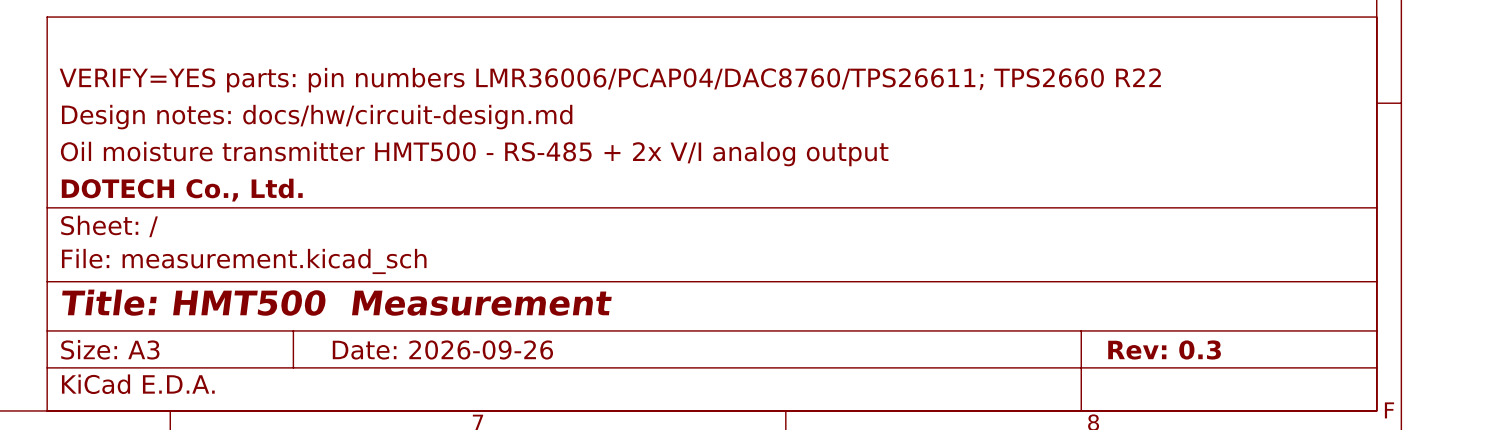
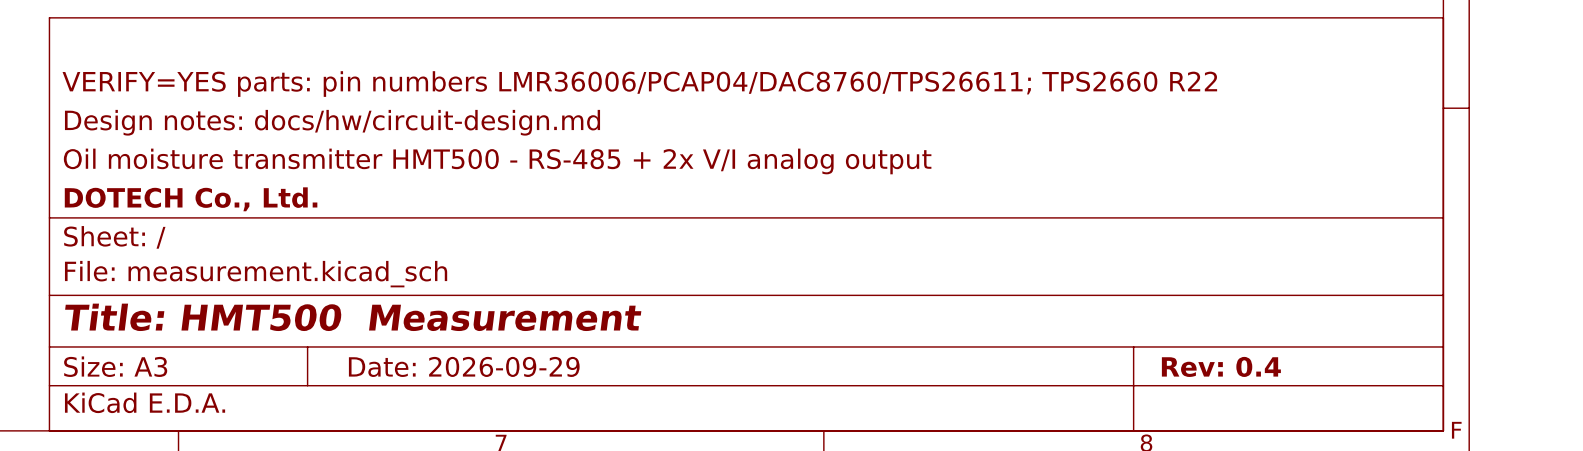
title block: Date: 2026-09-26 (442, 349) -> Date: 2026-09-29 (464, 366)
title block: Rev: 0.3 (1164, 349) -> Rev: 0.4 (1221, 366)

